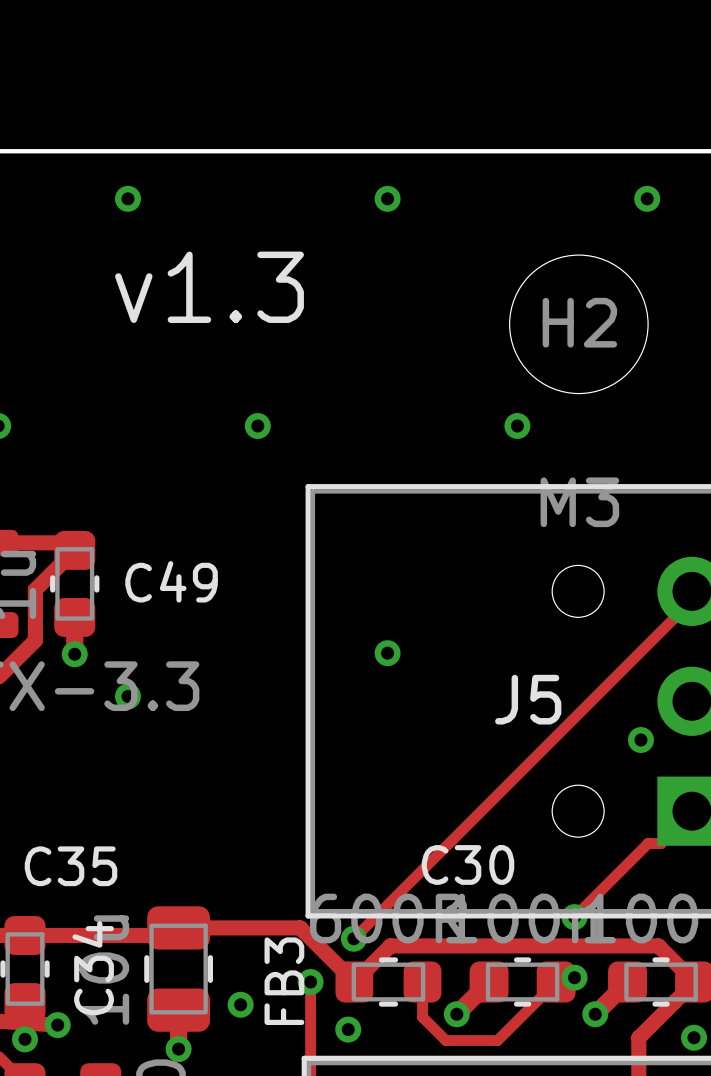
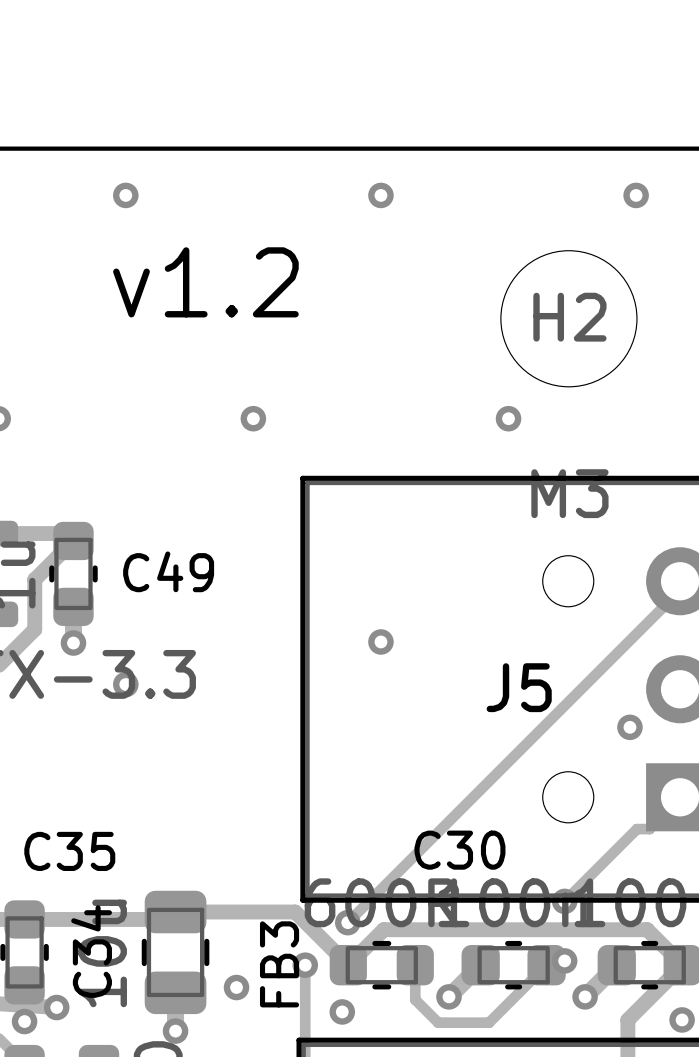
text: v1.3 (209, 287) -> v1.2 (205, 282)

